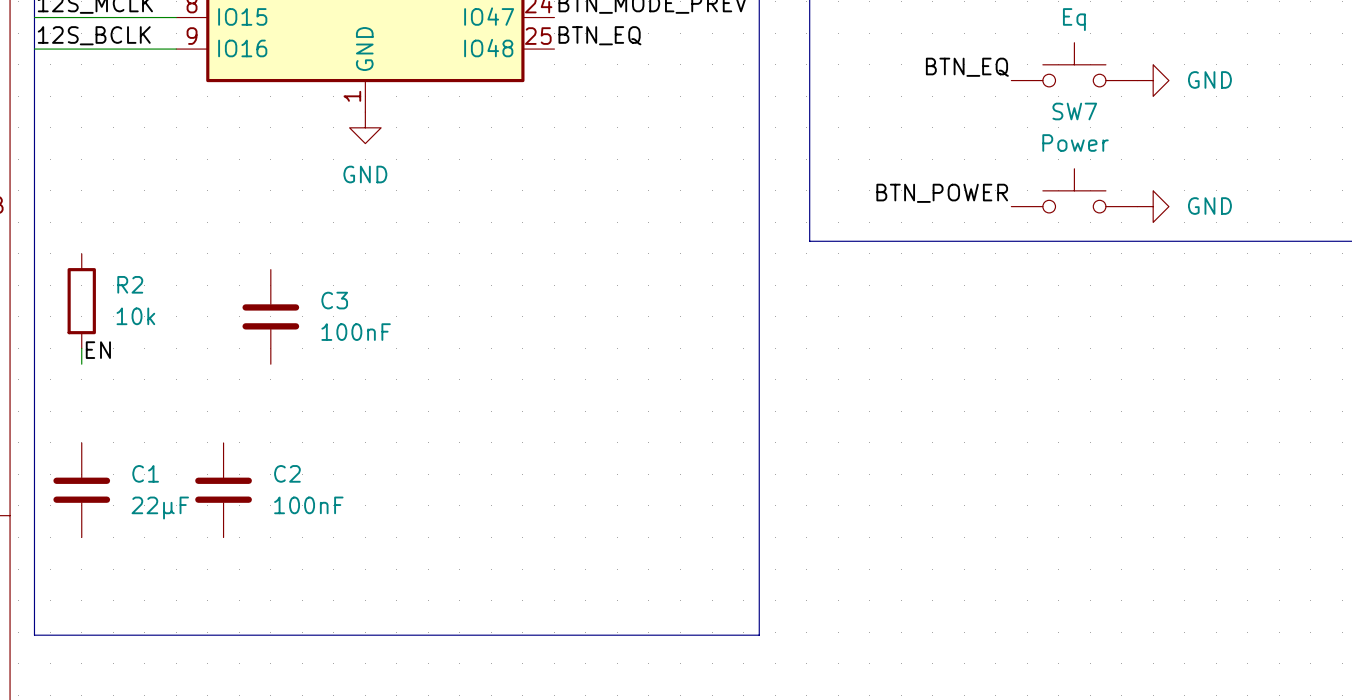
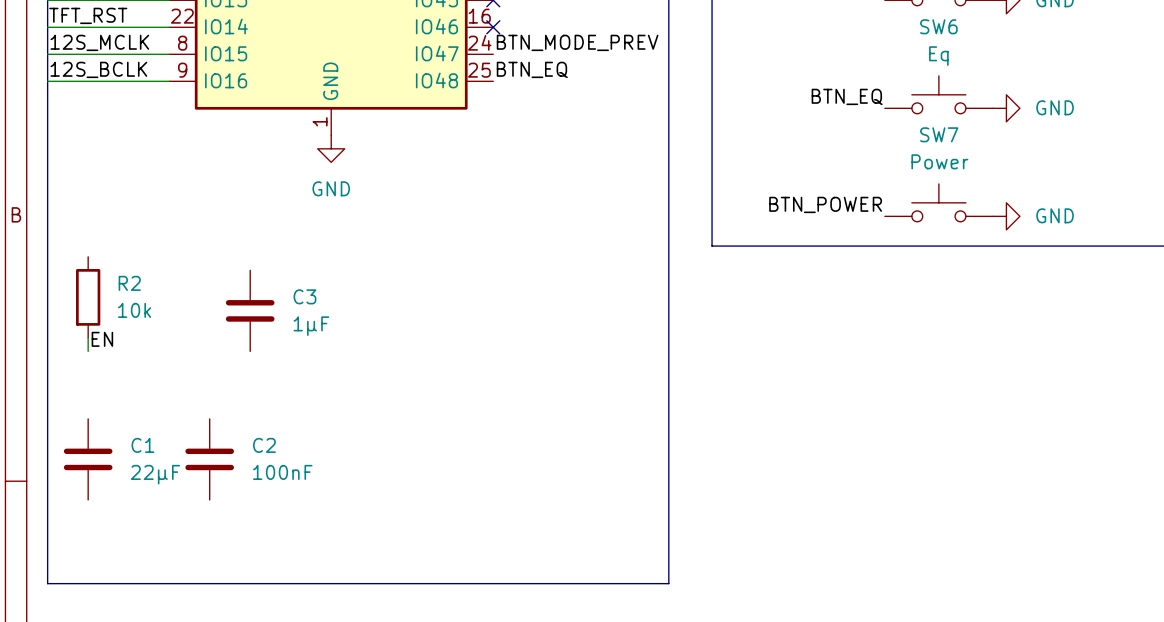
C3 value: 100nF (356, 332) -> 1μF (311, 326)

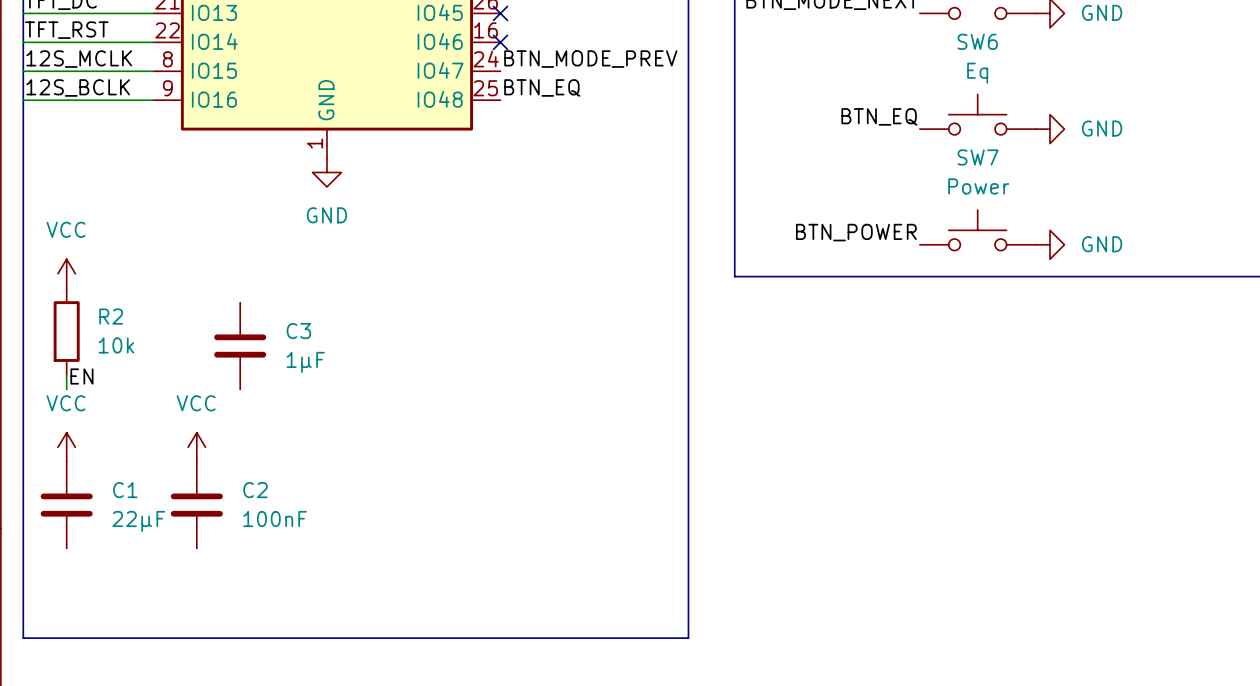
power symbol: none -> VCC (66, 273)
power symbol: none -> VCC (66, 447)
power symbol: none -> VCC (196, 447)

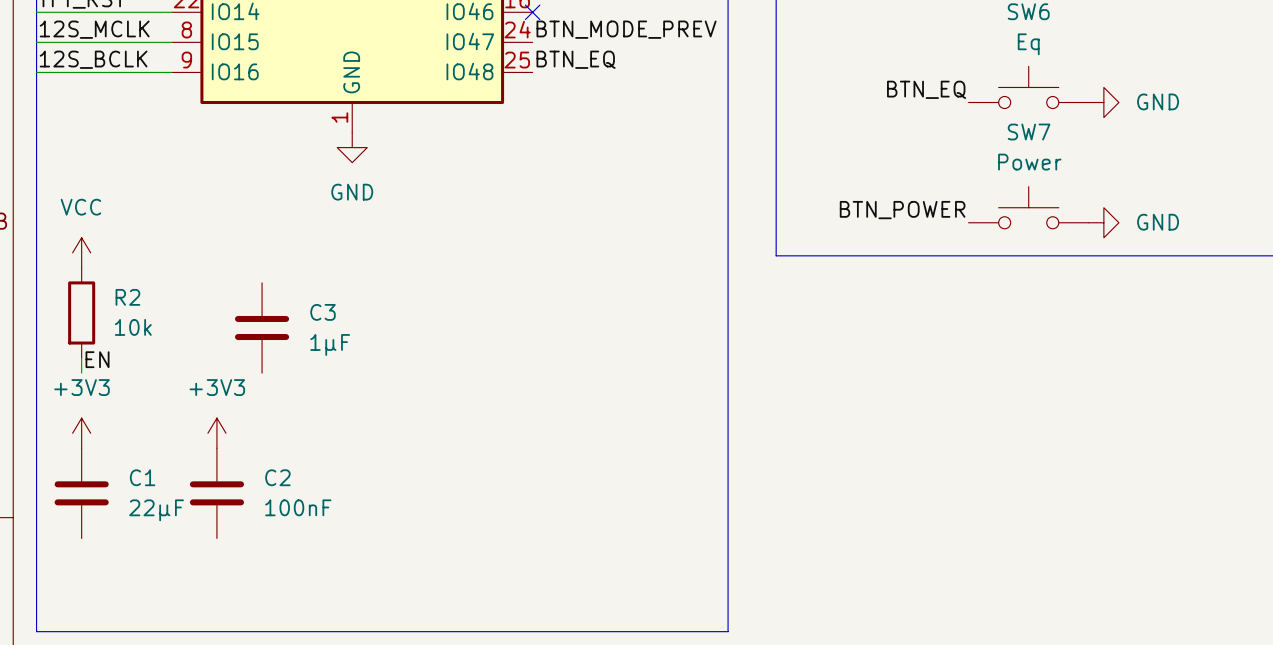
power symbol: VCC (66, 447) -> +3V3 (81, 433)
power symbol: VCC (196, 447) -> +3V3 (216, 433)

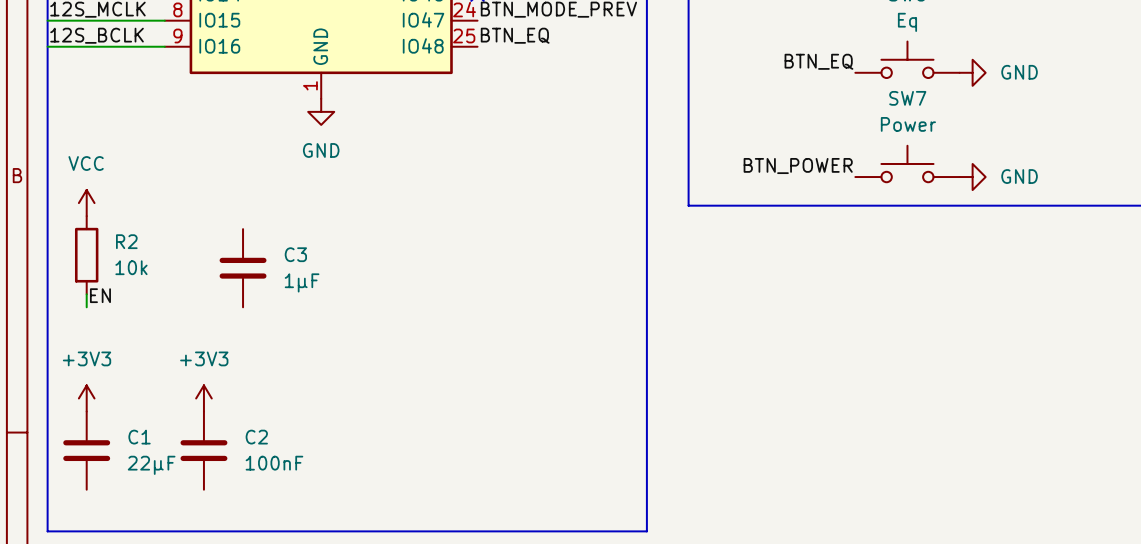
power symbol position: +3V3 (81, 433) -> +3V3 (86, 398)
power symbol position: +3V3 (216, 433) -> +3V3 (203, 398)
C1 position: (81, 493) -> (86, 450)
C2 position: (216, 493) -> (203, 450)

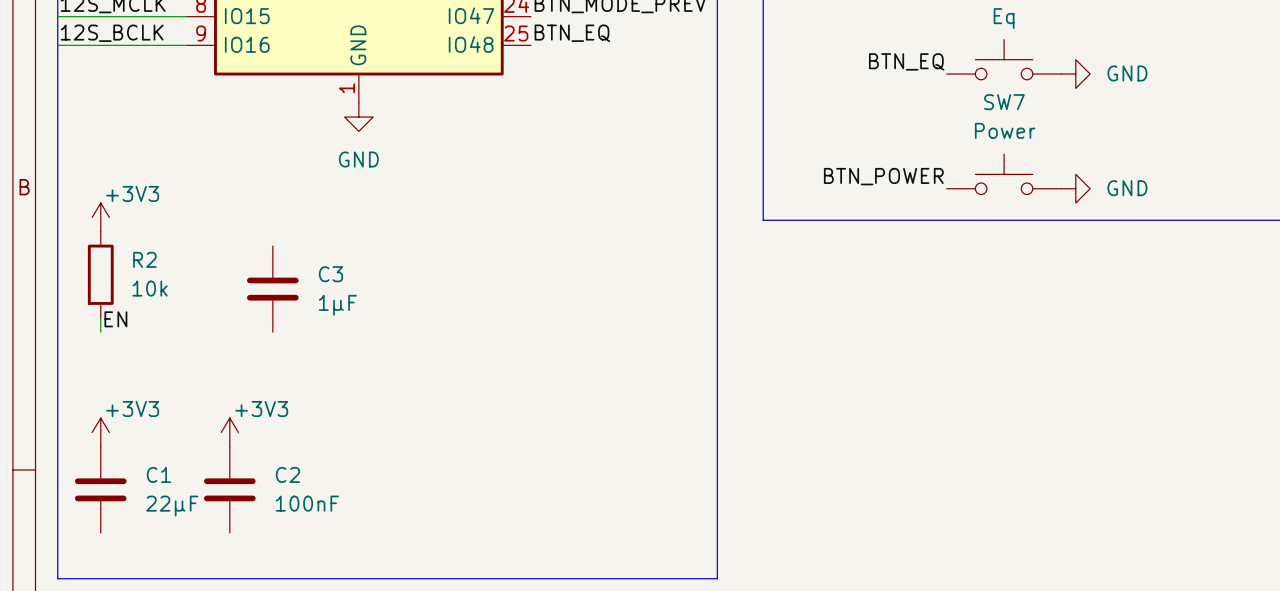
power symbol: VCC (86, 203) -> +3V3 (100, 217)
power symbol text position: +3V3 (87, 358) -> +3V3 (132, 409)
power symbol text position: +3V3 (204, 358) -> +3V3 (261, 409)

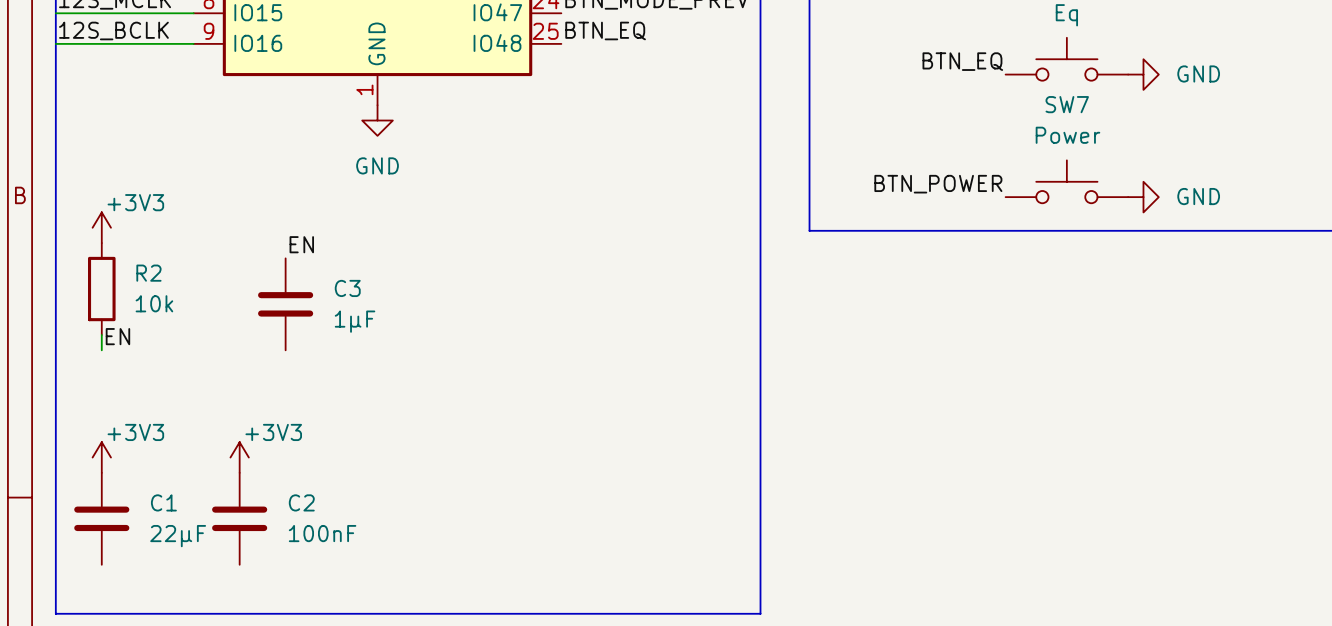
label: none -> EN (301, 244)

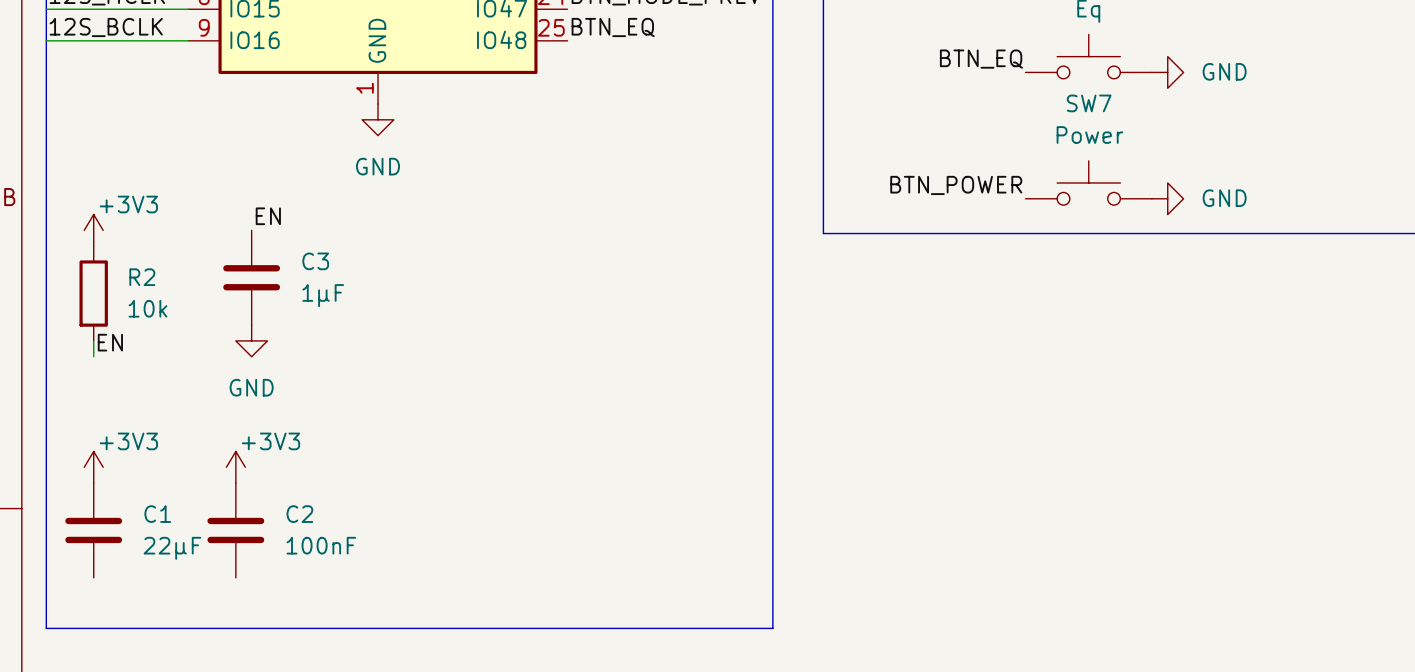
label position: EN (301, 244) -> EN (268, 216)
C3 position: (285, 304) -> (251, 277)
power symbol: none -> GND (251, 340)

